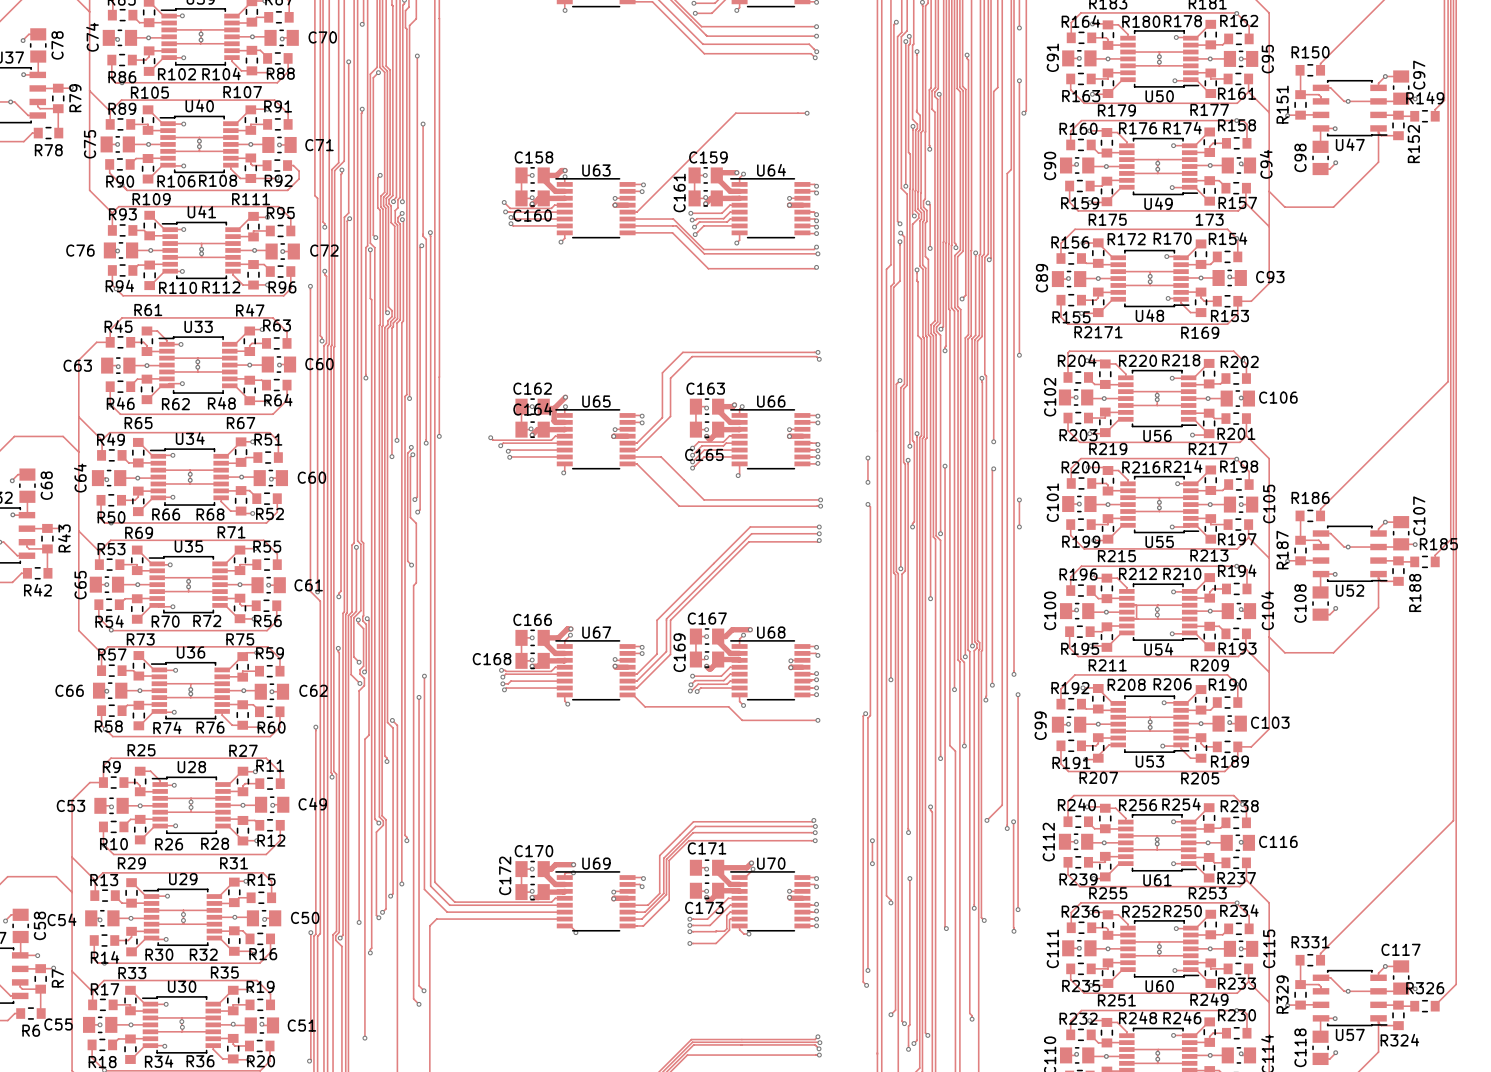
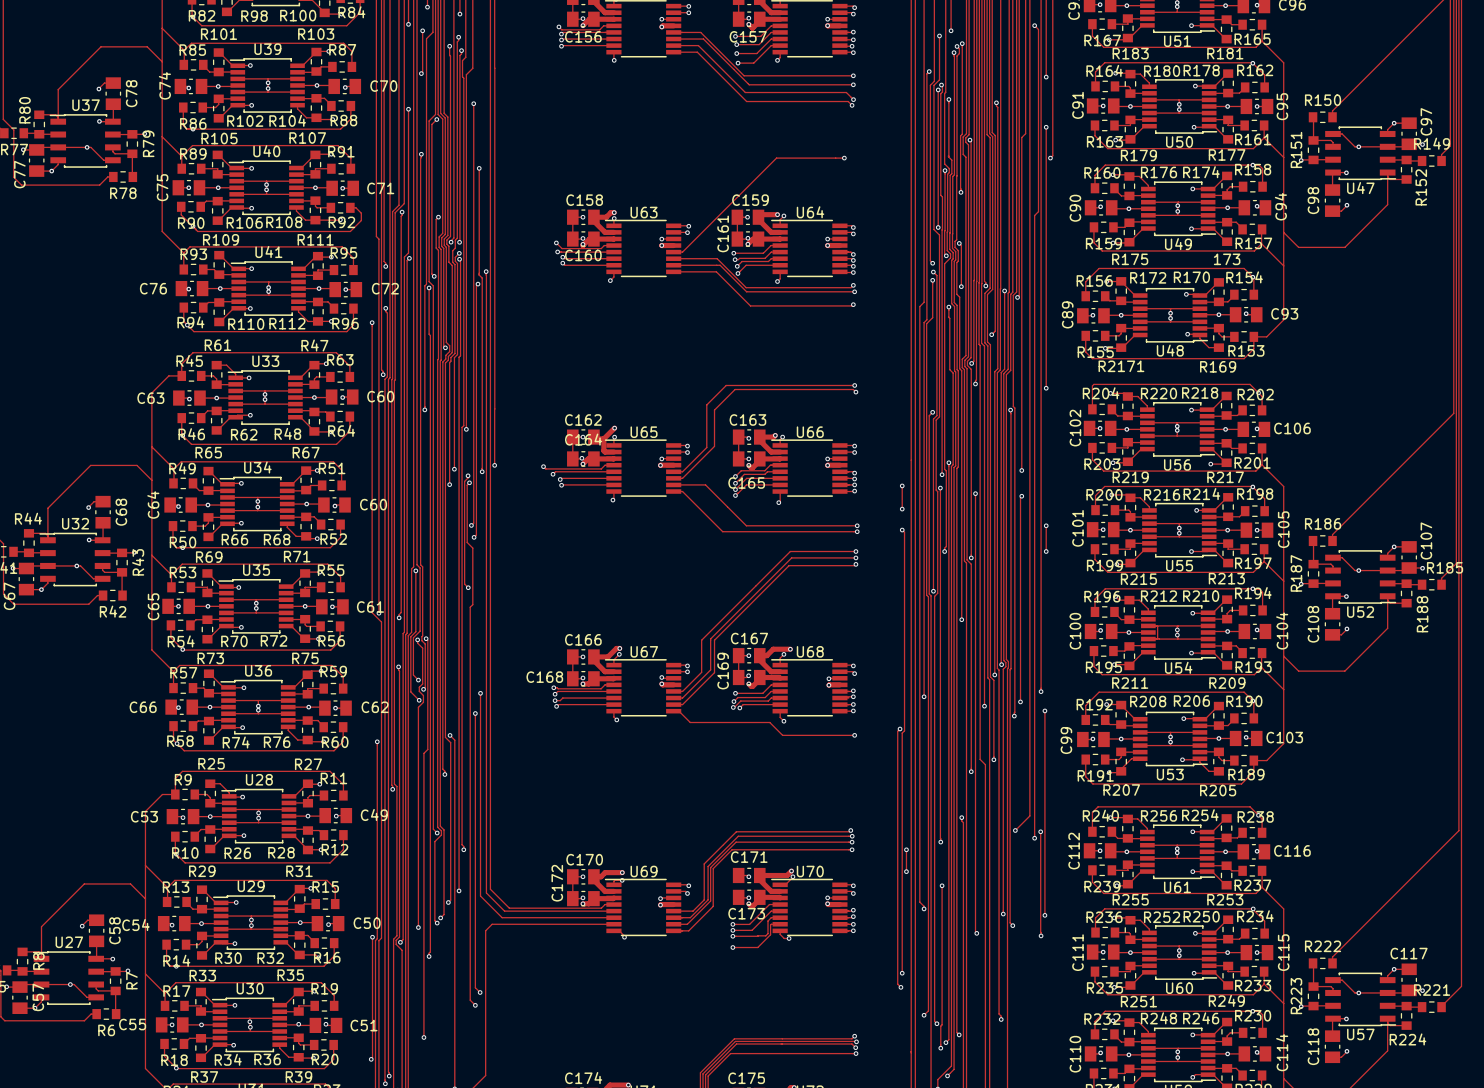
R331 name: R331 (1310, 942) -> R222 (1323, 946)
R326 name: R326 (1425, 988) -> R221 (1432, 990)
R329 name: R329 (1282, 994) -> R223 (1296, 996)
R324 name: R324 (1399, 1040) -> R224 (1407, 1039)

